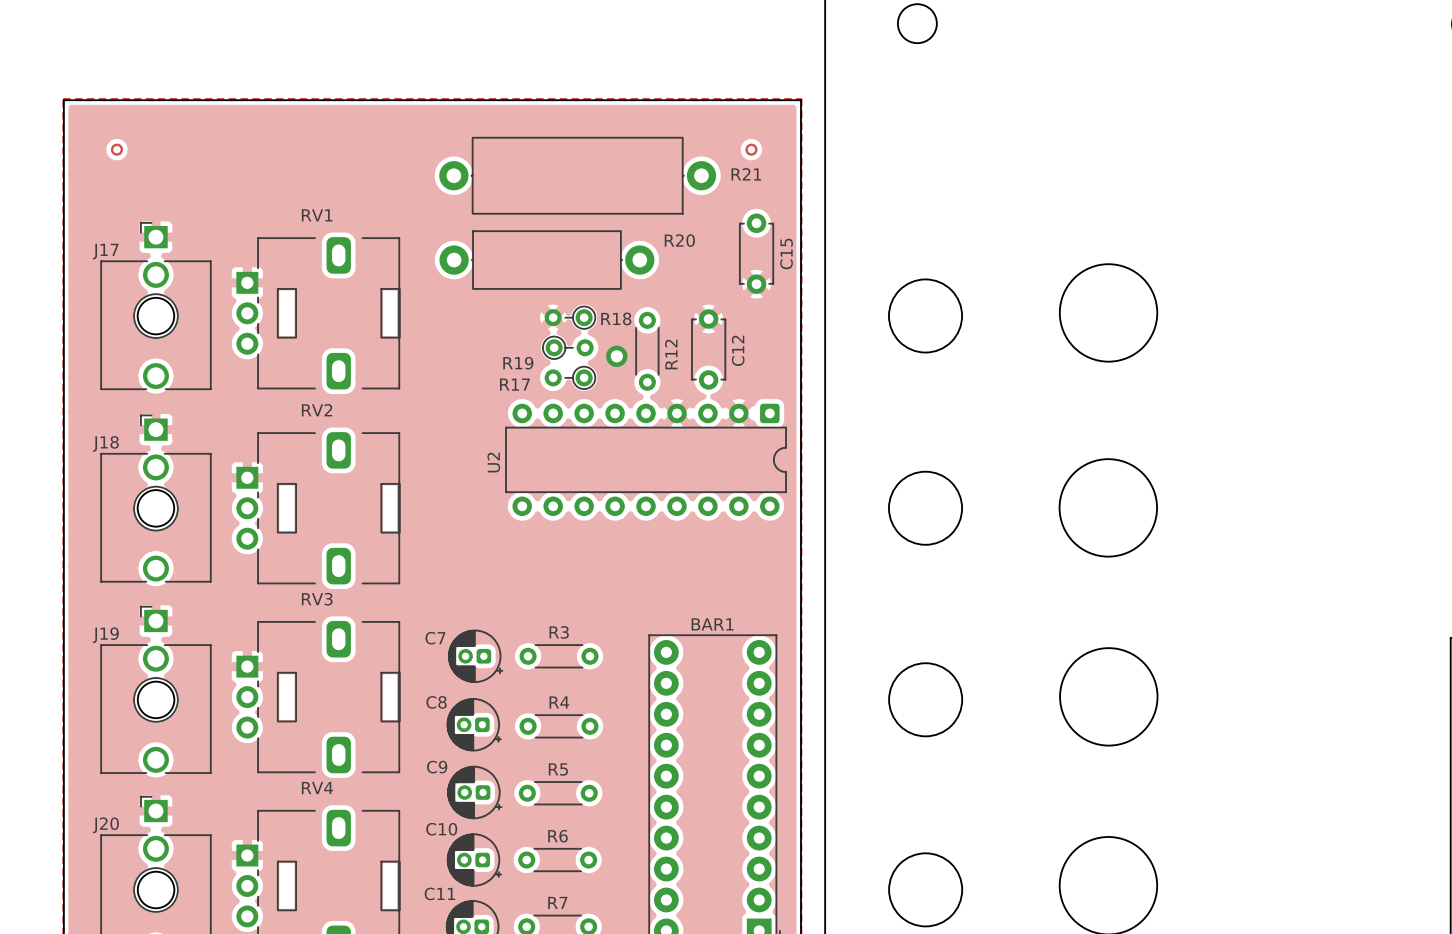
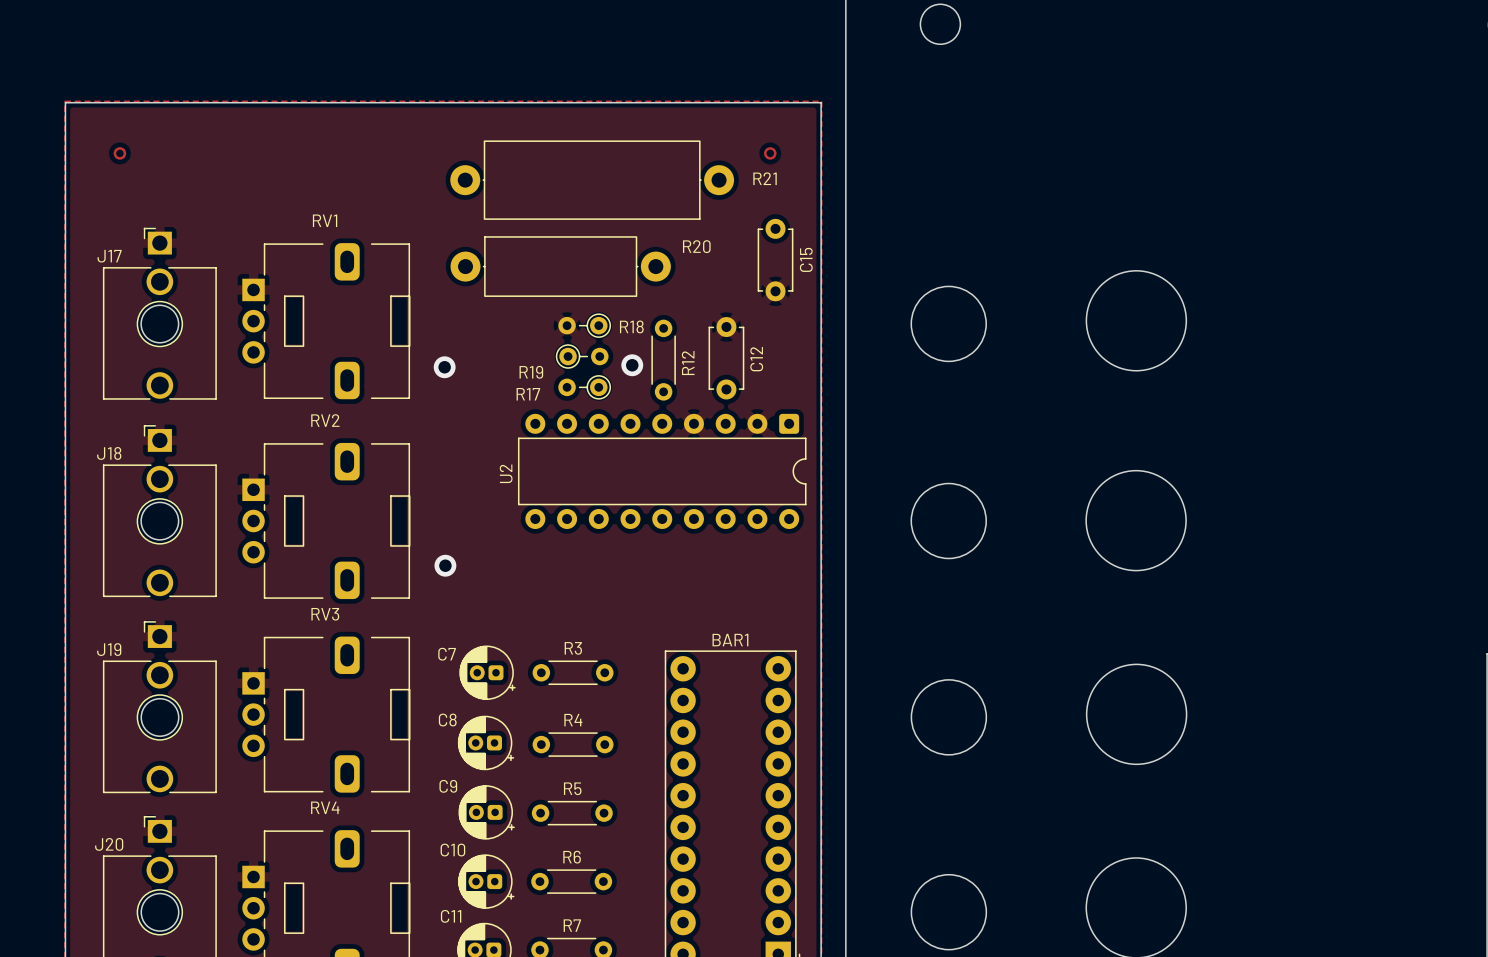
via: none -> (444, 367)
via: none -> (445, 565)

